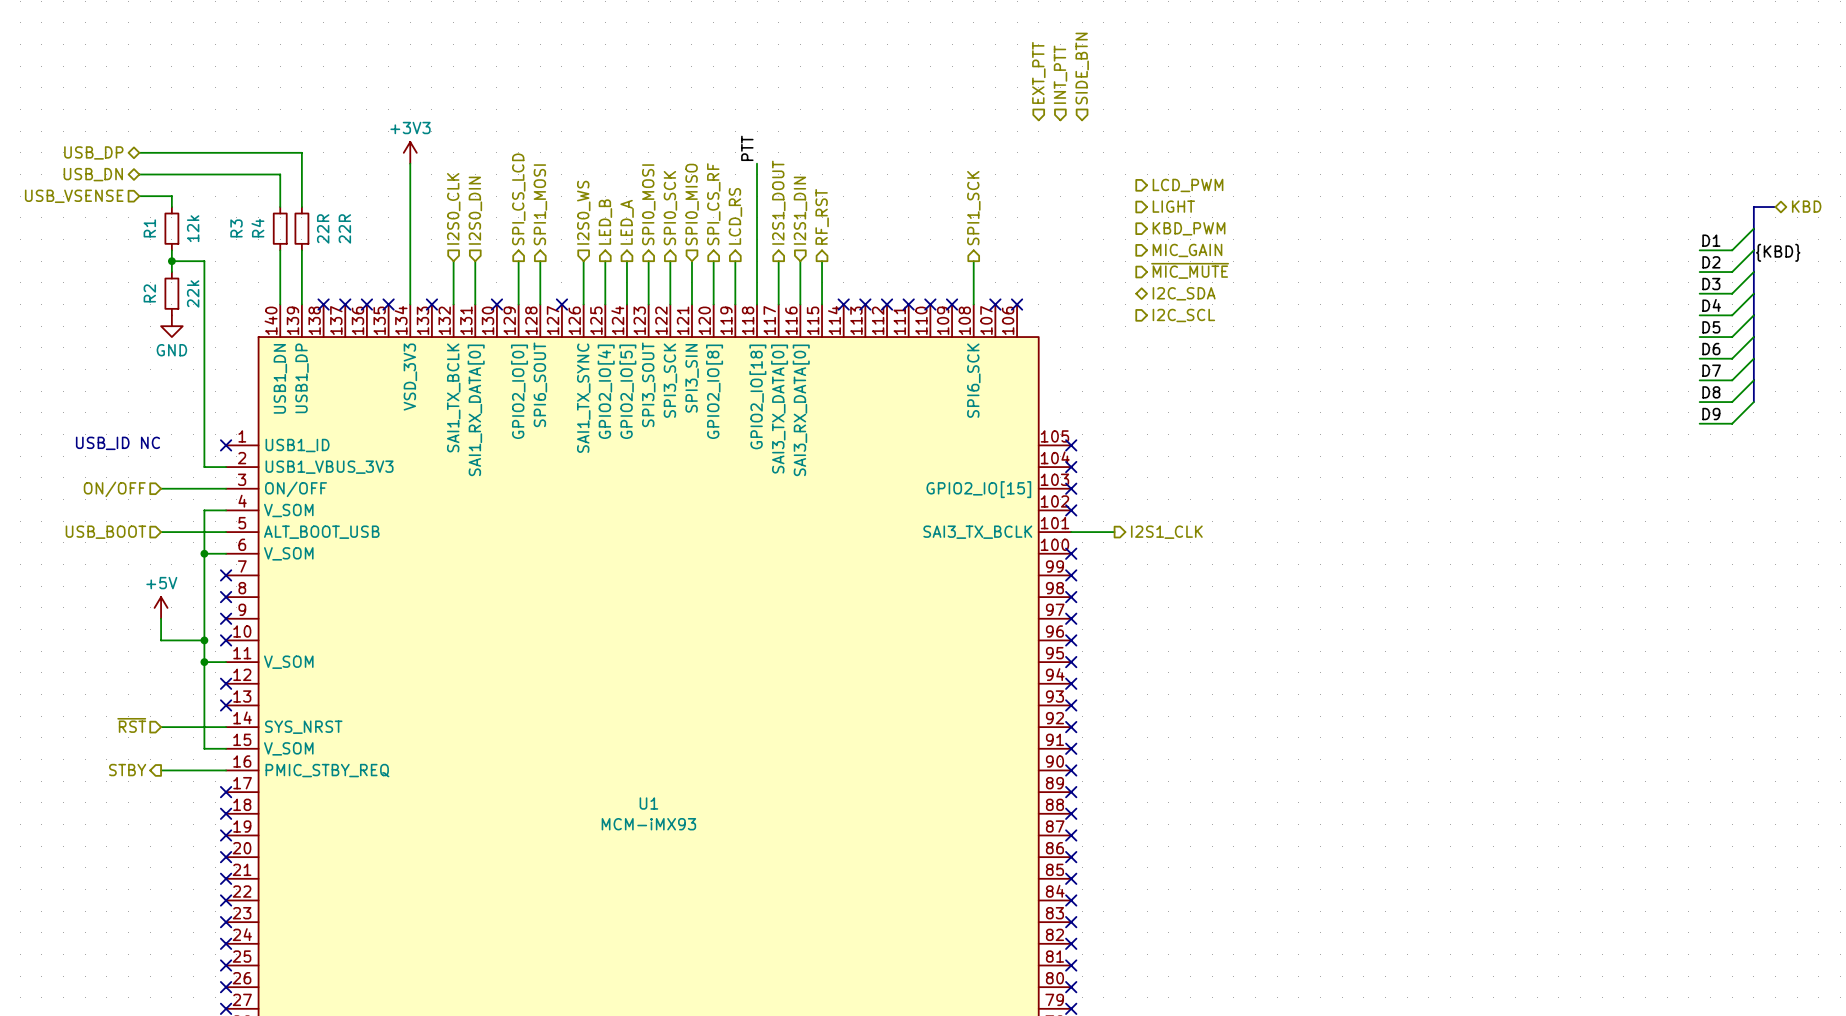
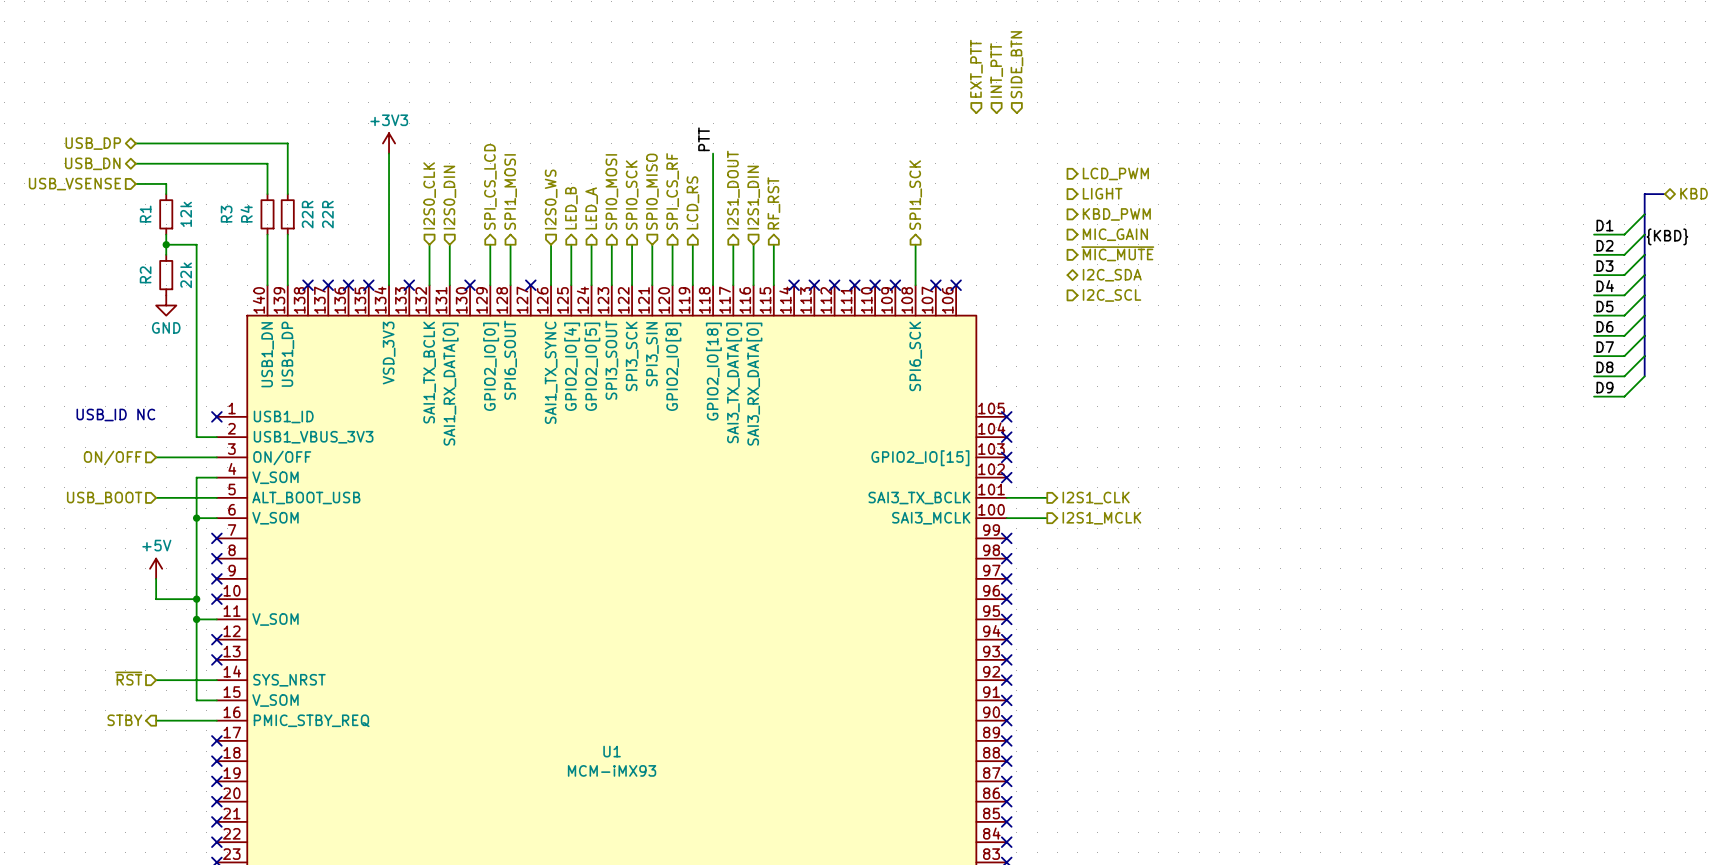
U1 pin name: none -> SAI3_MCLK (931, 518)
wire: none -> (1006, 518) (1047, 518)
no-connect mark: (1071, 553) -> none
hierarchical label: none -> I2S1_MCLK (1101, 518)

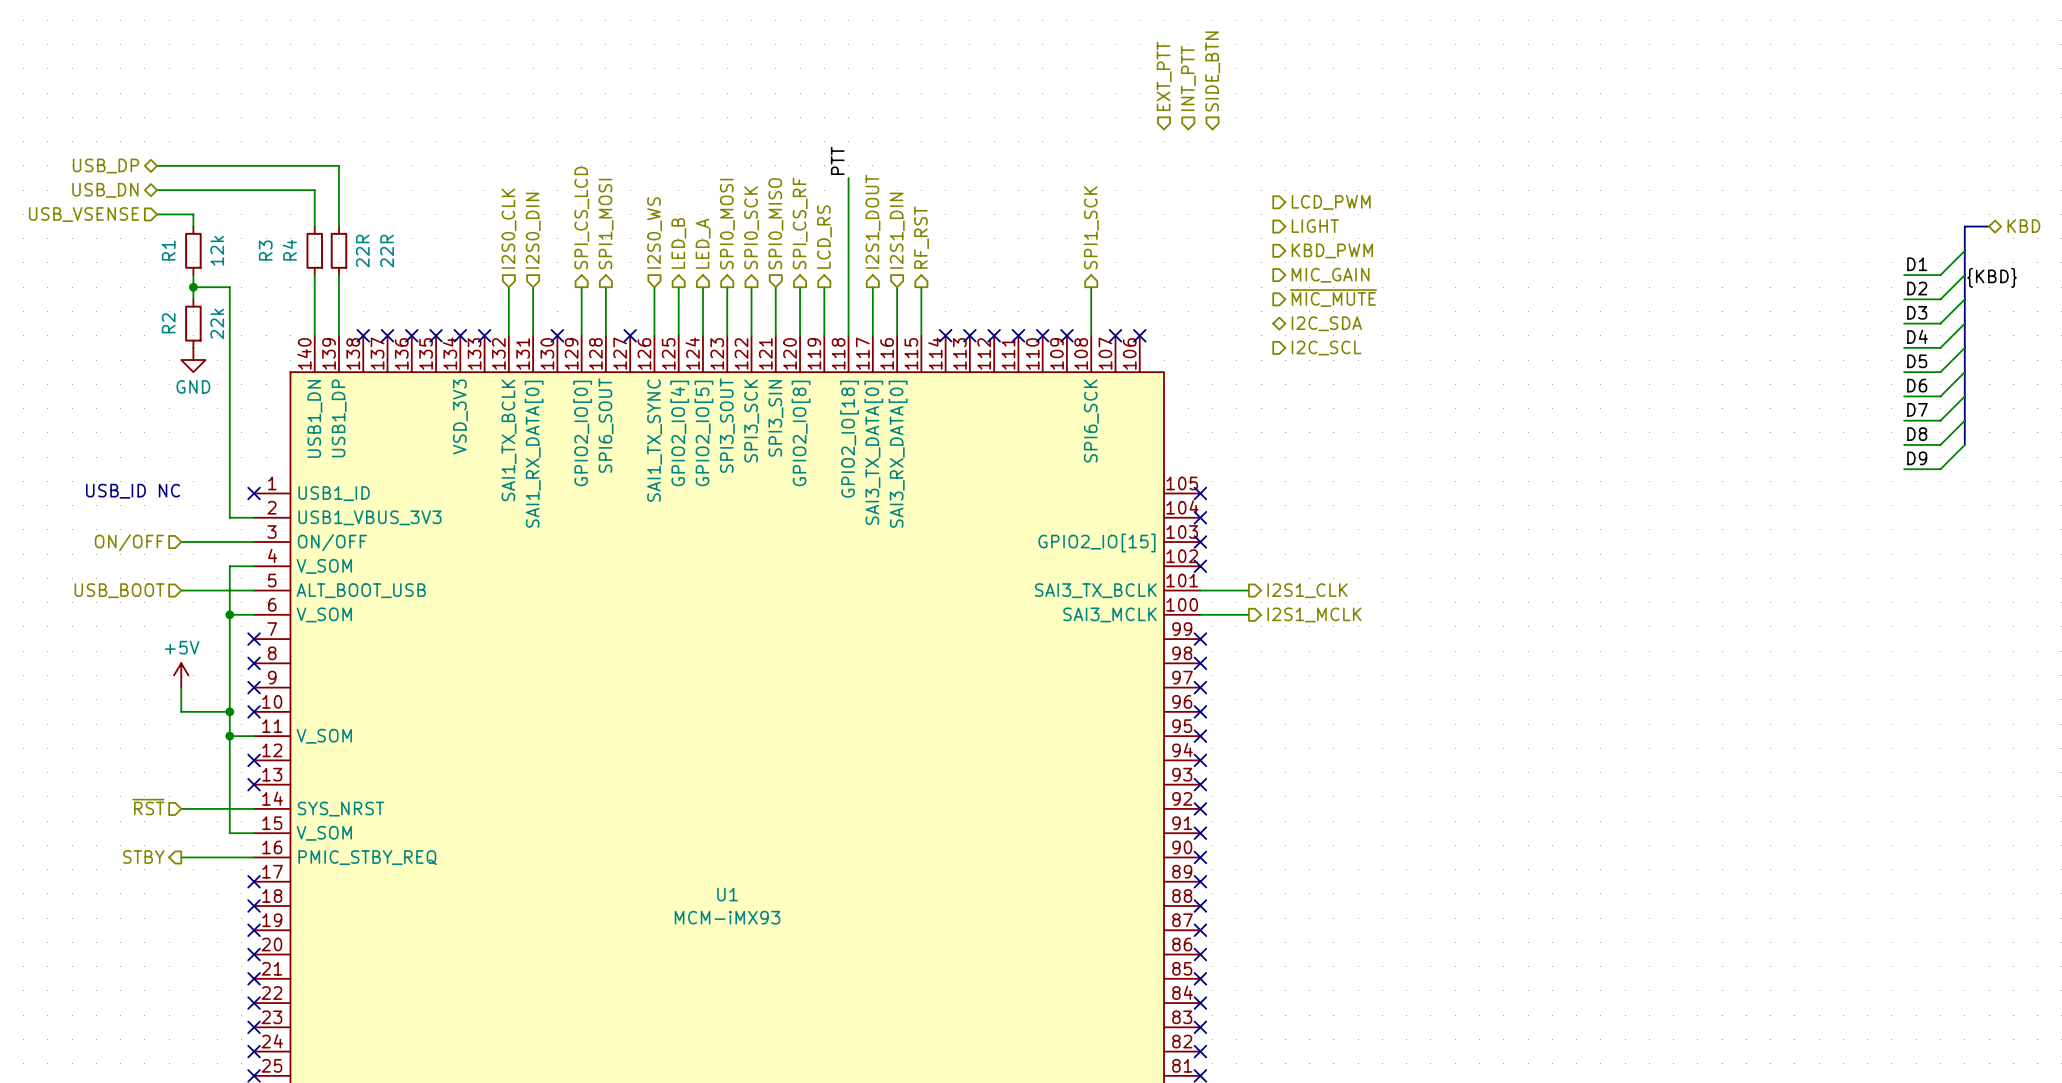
power symbol: +3V3 (389, 143) -> none
wire: (389, 153) (389, 285) -> none
no-connect mark: none -> (460, 335)

